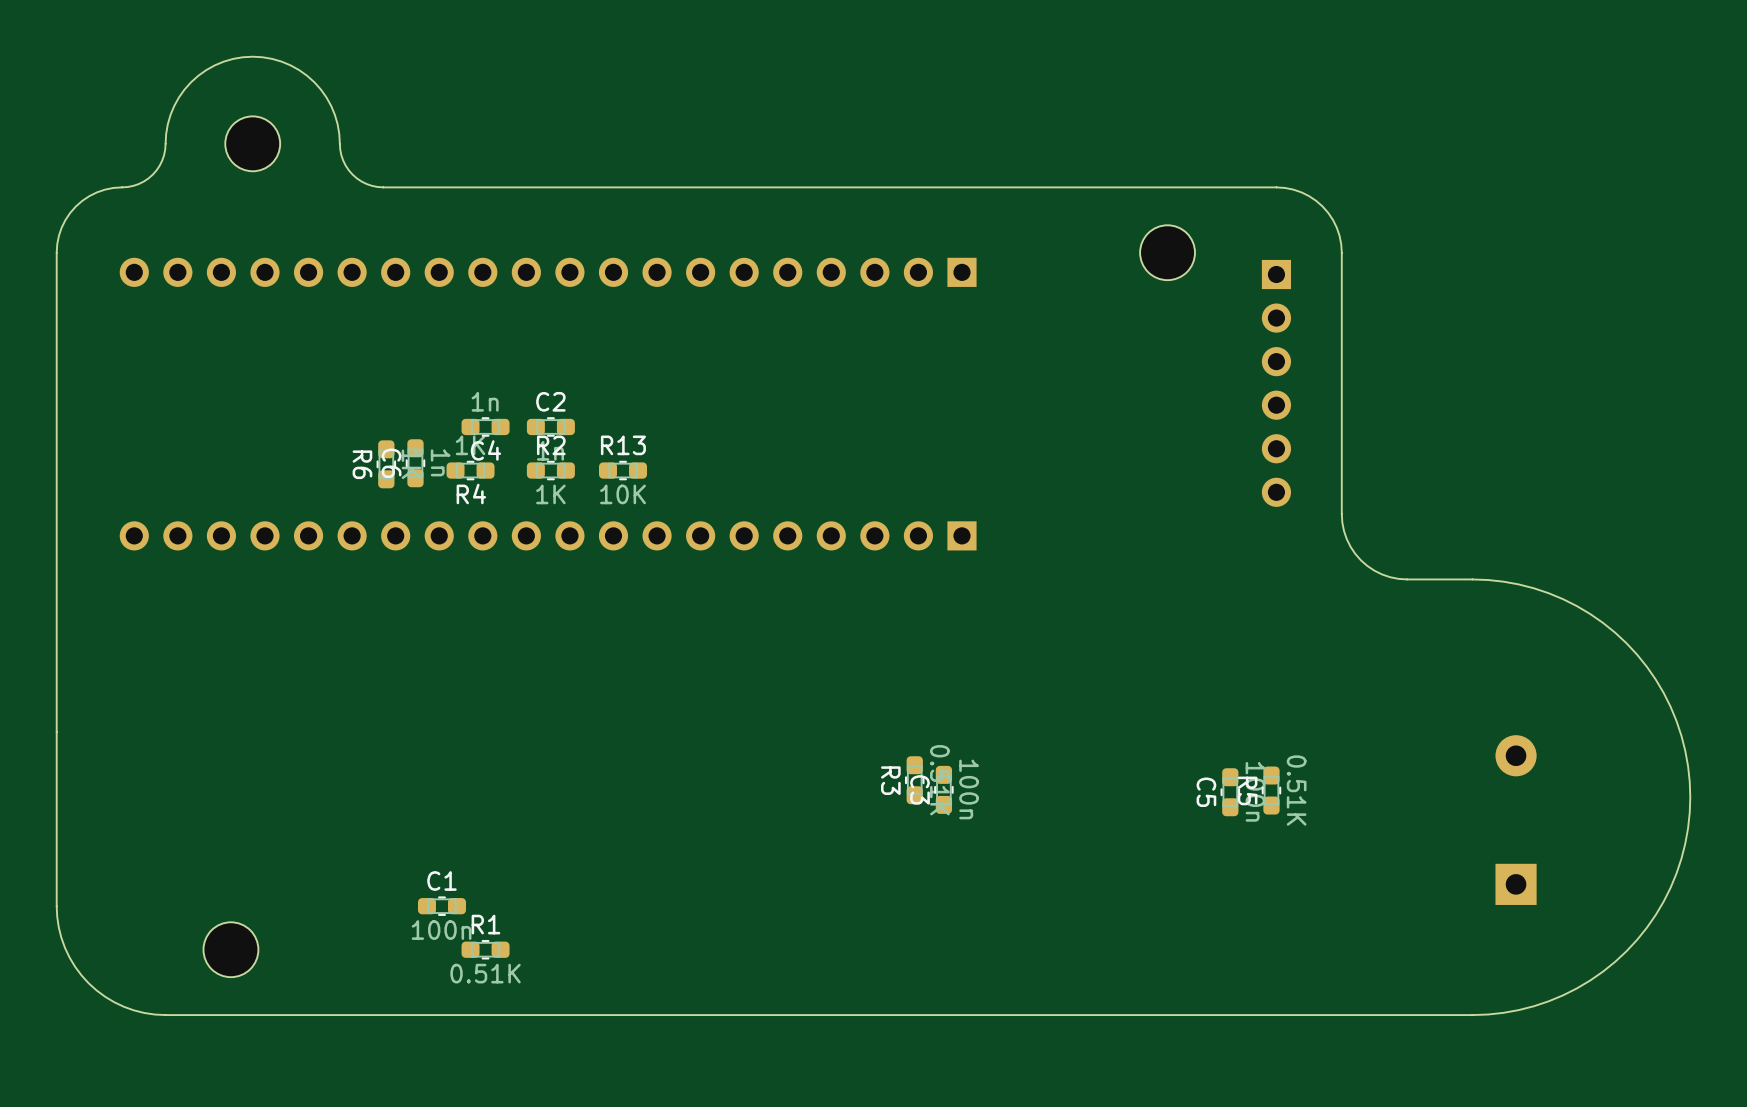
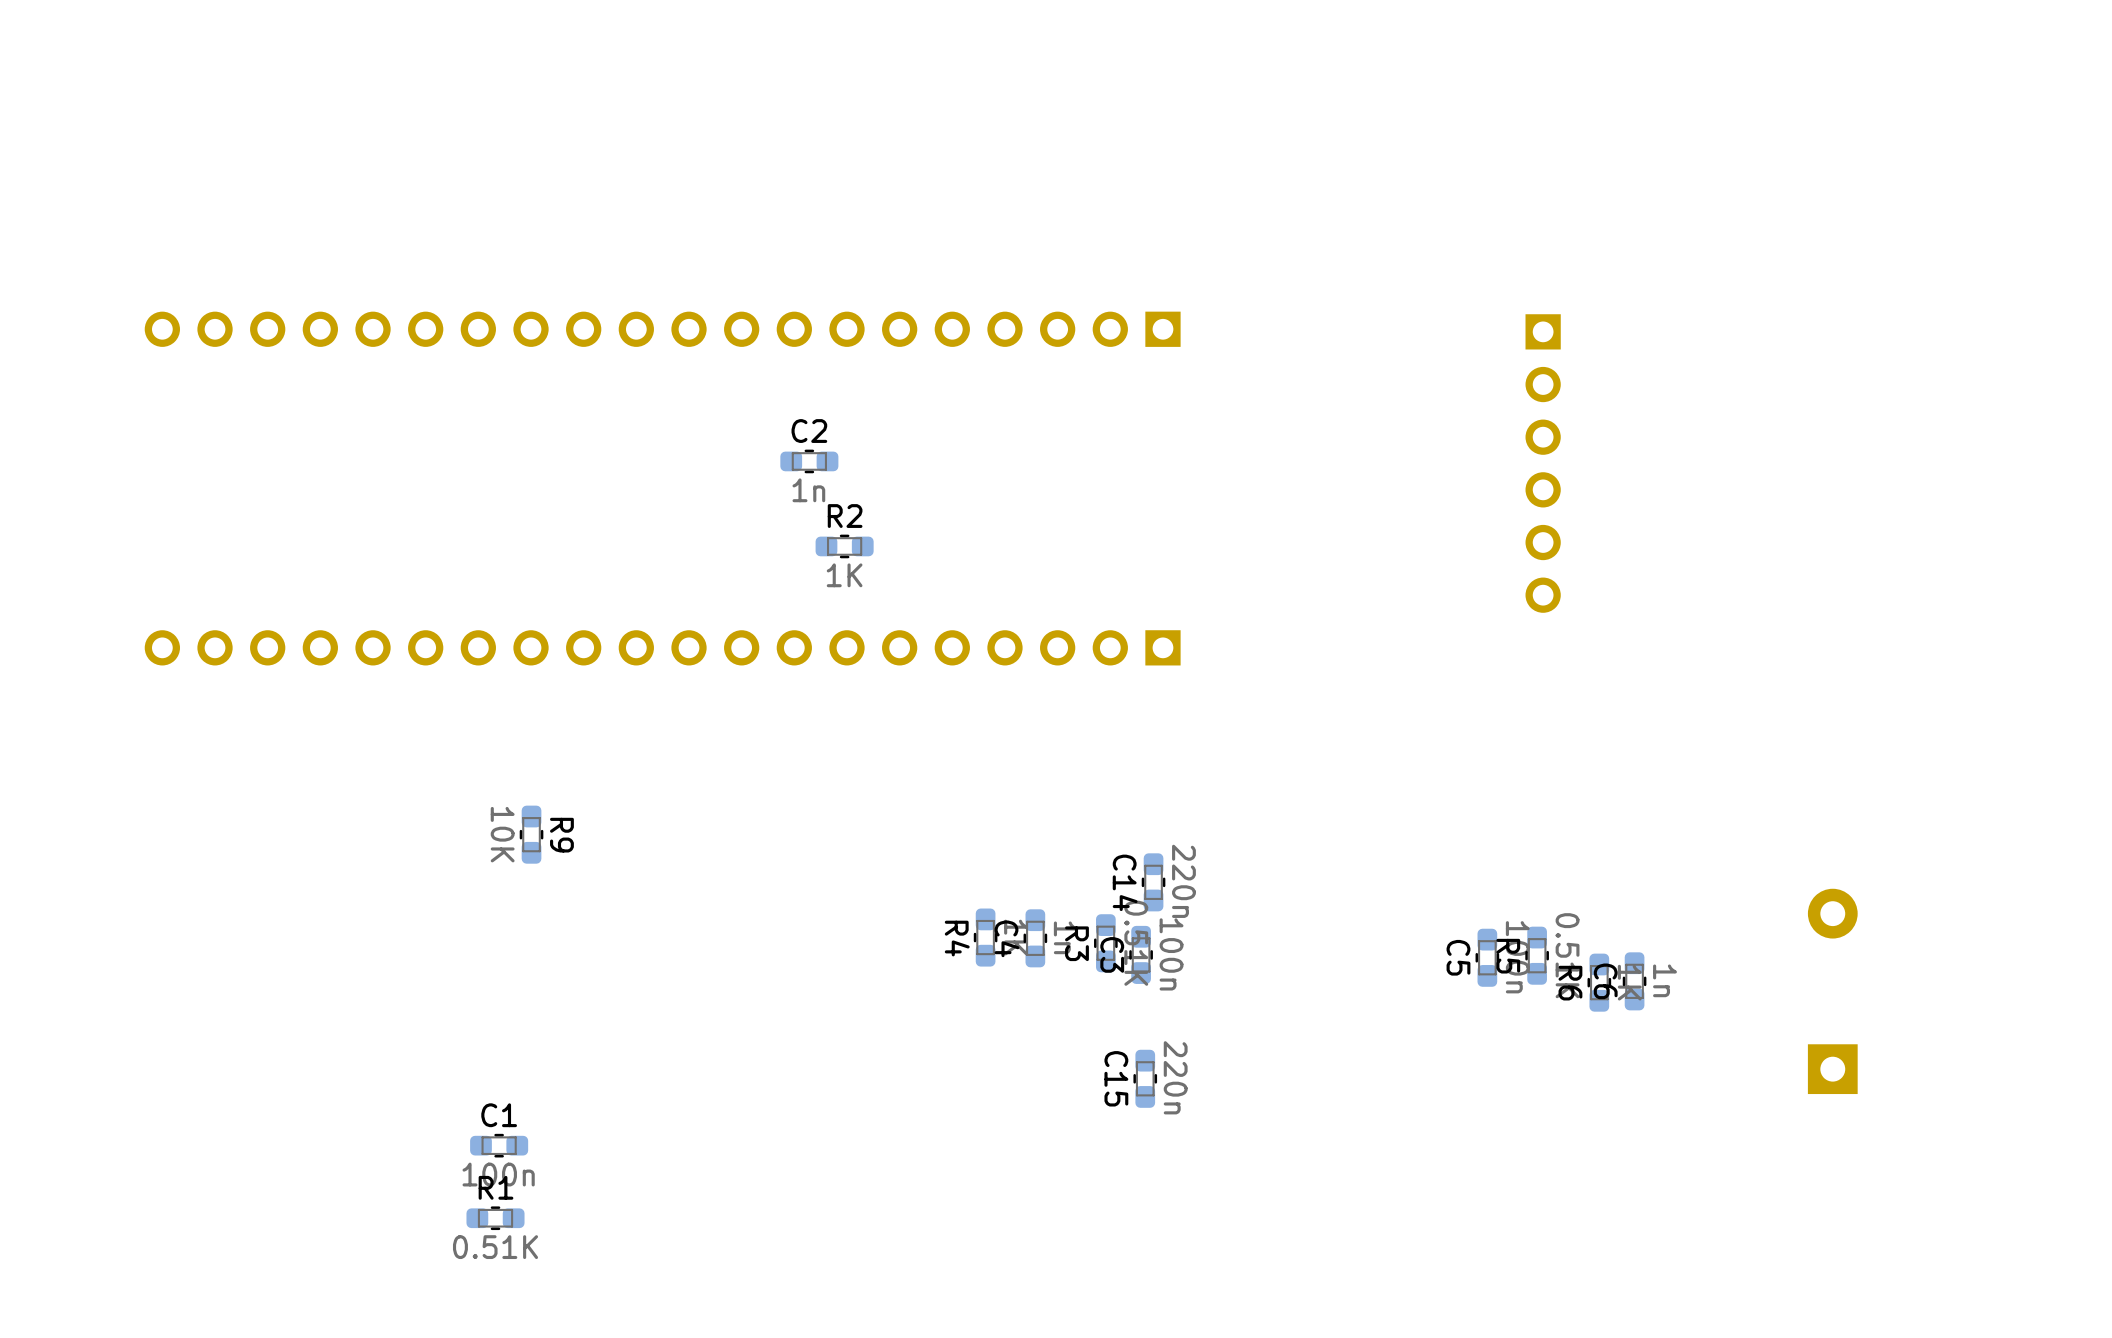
part: (252, 143) -> none
board edge: (339, 143) (337, 124) (331, 106) (320, 89) (307, 75) (281, 61) (262, 57) (242, 57) (223, 61) (198, 75) (178, 97) (167, 124) (164, 155) (152, 174) (133, 185) (105, 189) (89, 196) (70, 212) (58, 235) (56, 252) (57, 916) (61, 937) (75, 966) (88, 983) (114, 1002) (133, 1010) (165, 1015) (1488, 1014) (1518, 1010) (1548, 1001) (1590, 980) (1626, 951) (1646, 927) (1663, 901) (1676, 873) (1685, 843) (1690, 797) (1688, 766) (1681, 735) (1670, 706) (1655, 679) (1637, 654) (1615, 632) (1590, 614) (1548, 593) (1518, 584) (1488, 580) (1407, 579) (1390, 577) (1367, 565) (1350, 546) (1344, 531) (1341, 514) (1341, 244) (1333, 220) (1322, 206) (1309, 196) (1293, 189) (1276, 187) (383, 187) (366, 184) (352, 174) (343, 160) (339, 143) -> none
part: (1167, 252) -> none
C4 rotation: 0° (485, 426) -> 90° clockwise (1035, 938)
C4 position: (485, 426) -> (1035, 938)
C2 position: (550, 426) -> (809, 461)
C6 position: (415, 463) -> (1634, 981)
R6 position: (386, 464) -> (1599, 982)
R4 rotation: 0° (470, 470) -> 90° clockwise (985, 937)
R4 position: (470, 470) -> (985, 937)
R2 position: (550, 470) -> (844, 546)
R13: 10K (623, 470) -> none
R9: none -> 10K (531, 834)
C14: none -> 220n (1153, 882)
C15: none -> 220n (1145, 1078)
C1 position: (441, 906) -> (499, 1145)
part: (230, 949) -> none
R1 position: (485, 949) -> (495, 1218)

